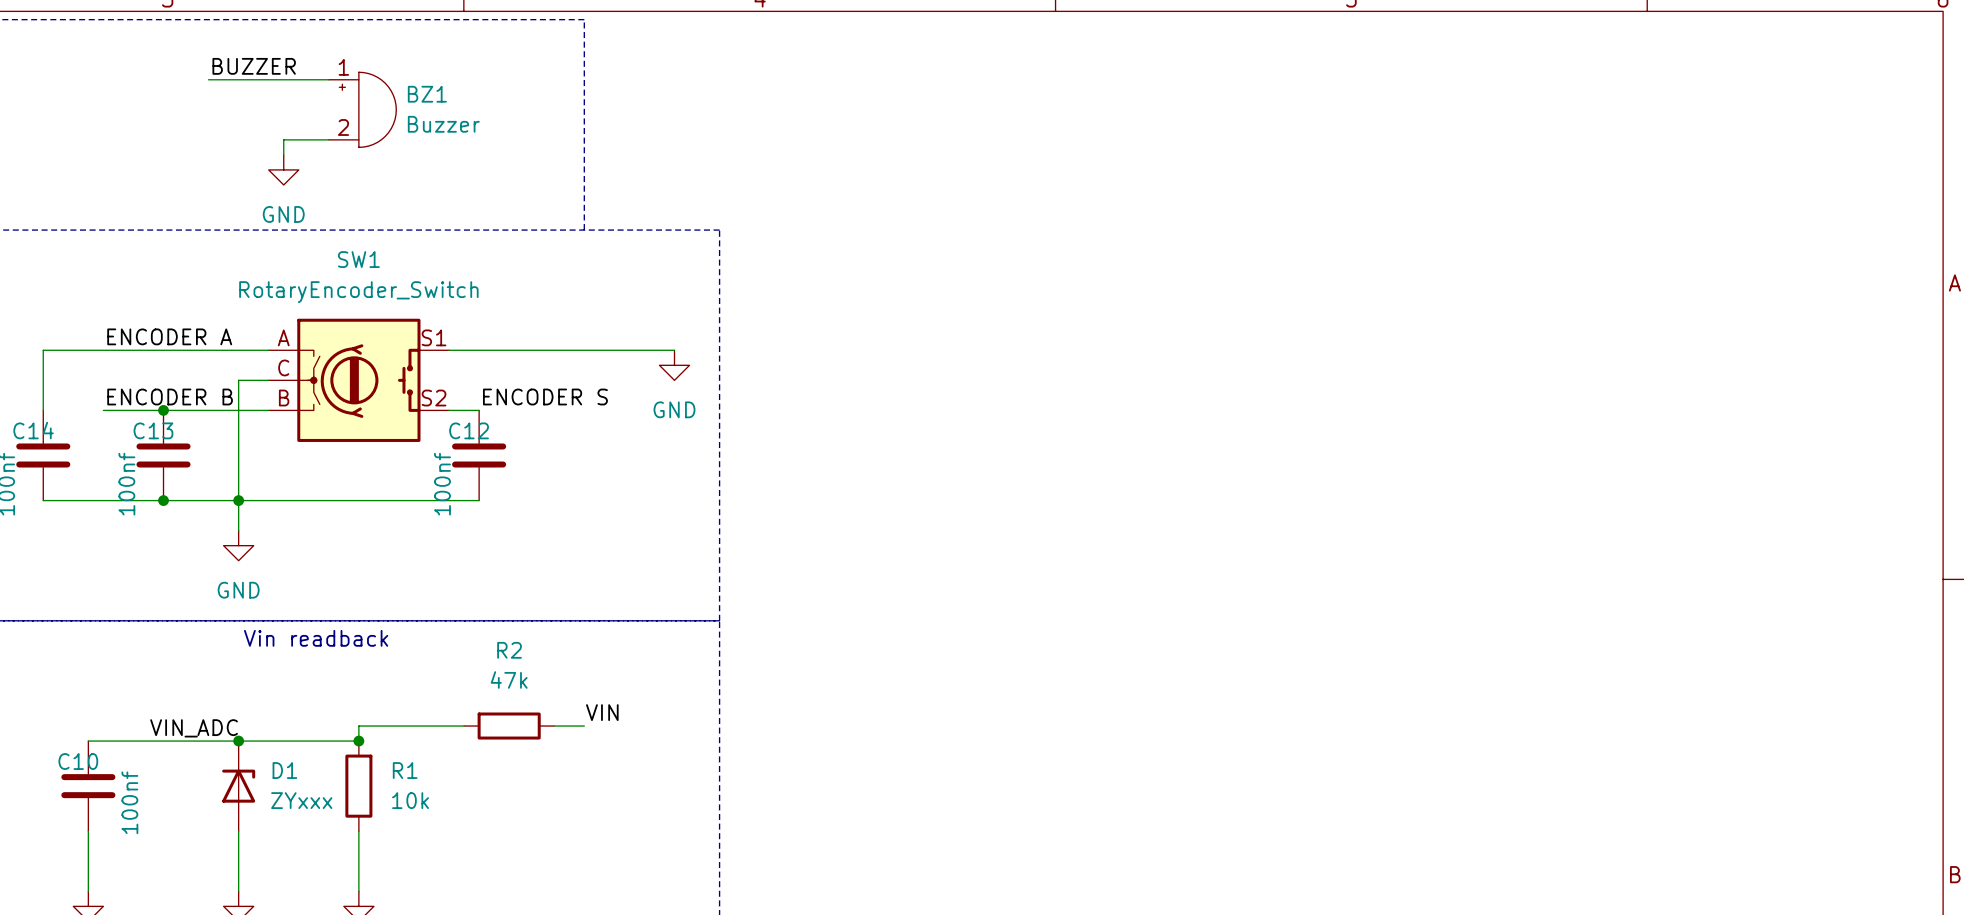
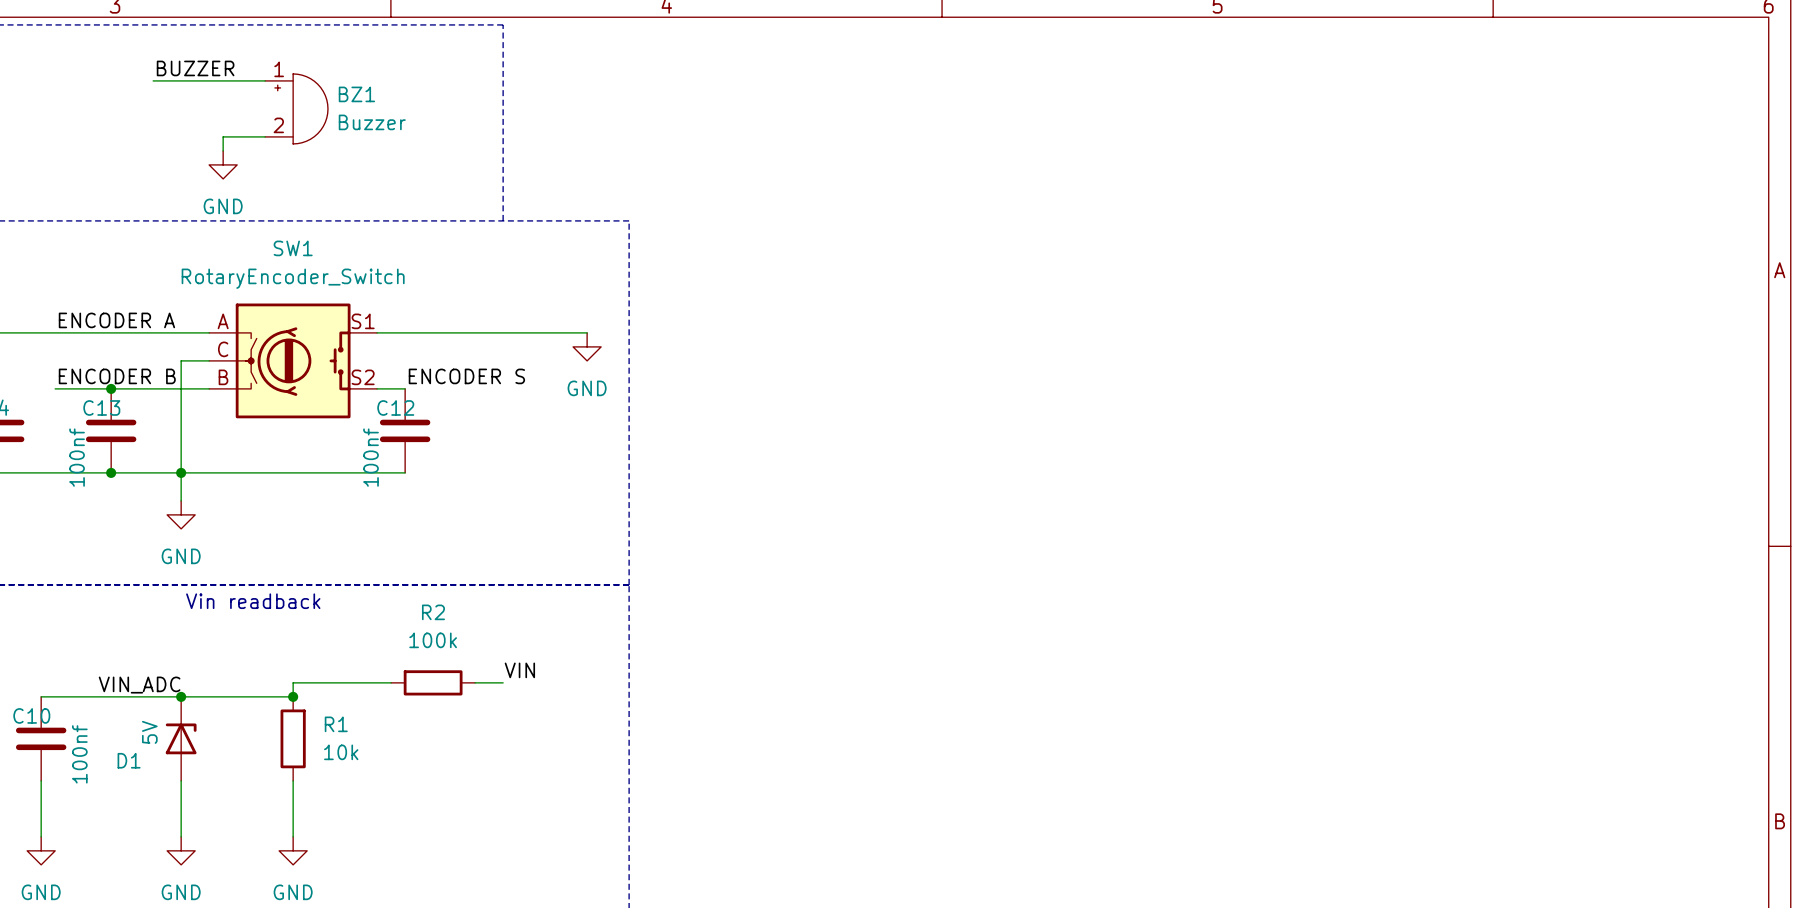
R2 value: 47k (509, 680) -> 100k (433, 640)
D1 name position: D1 (284, 770) -> D1 (129, 760)
D1 value: ZYxxx (301, 800) -> 5V (149, 732)

